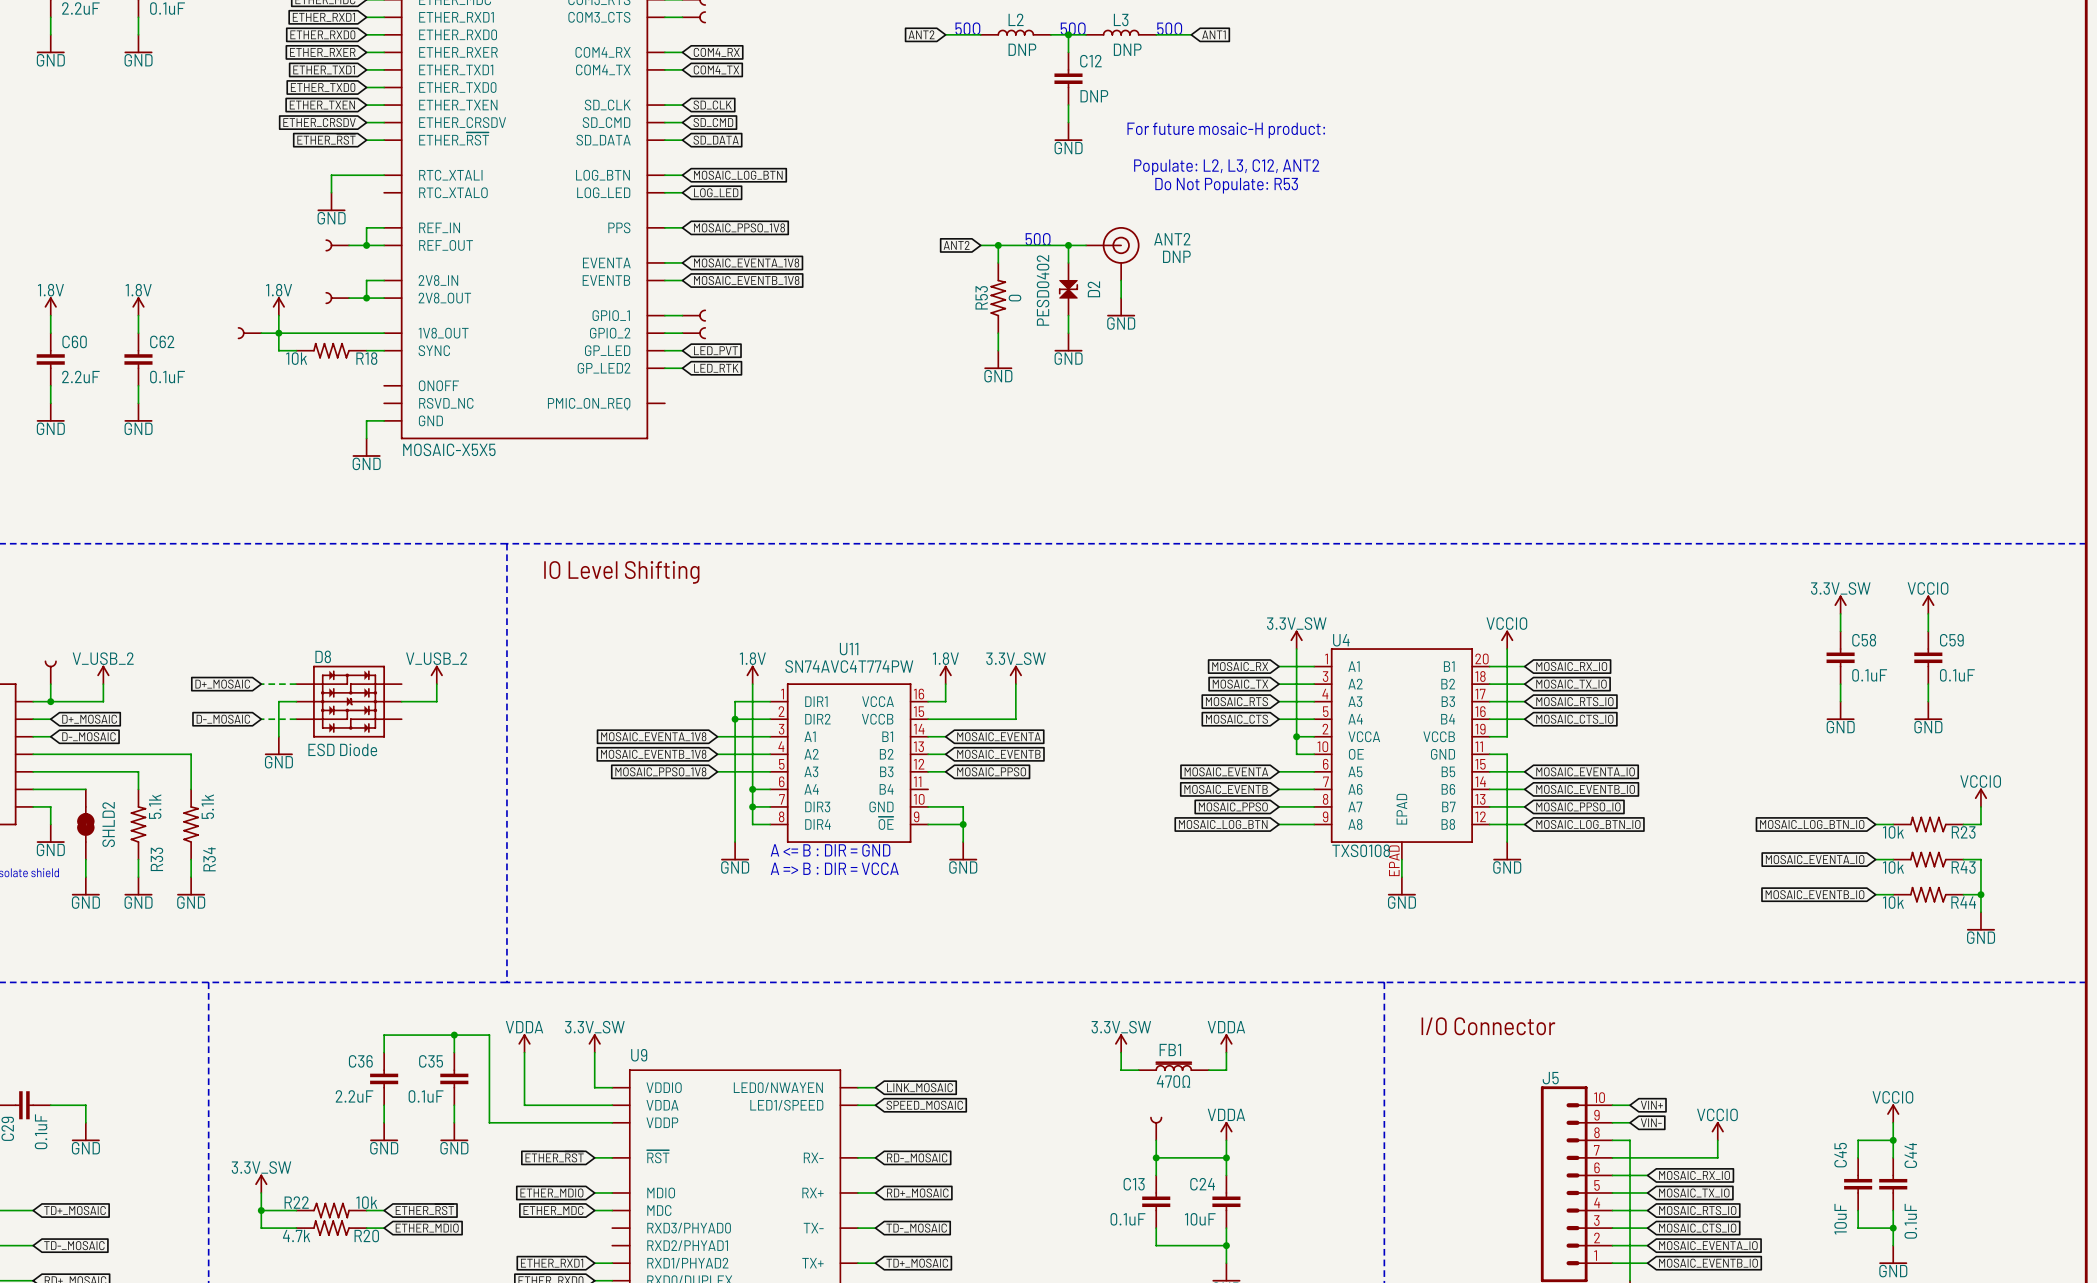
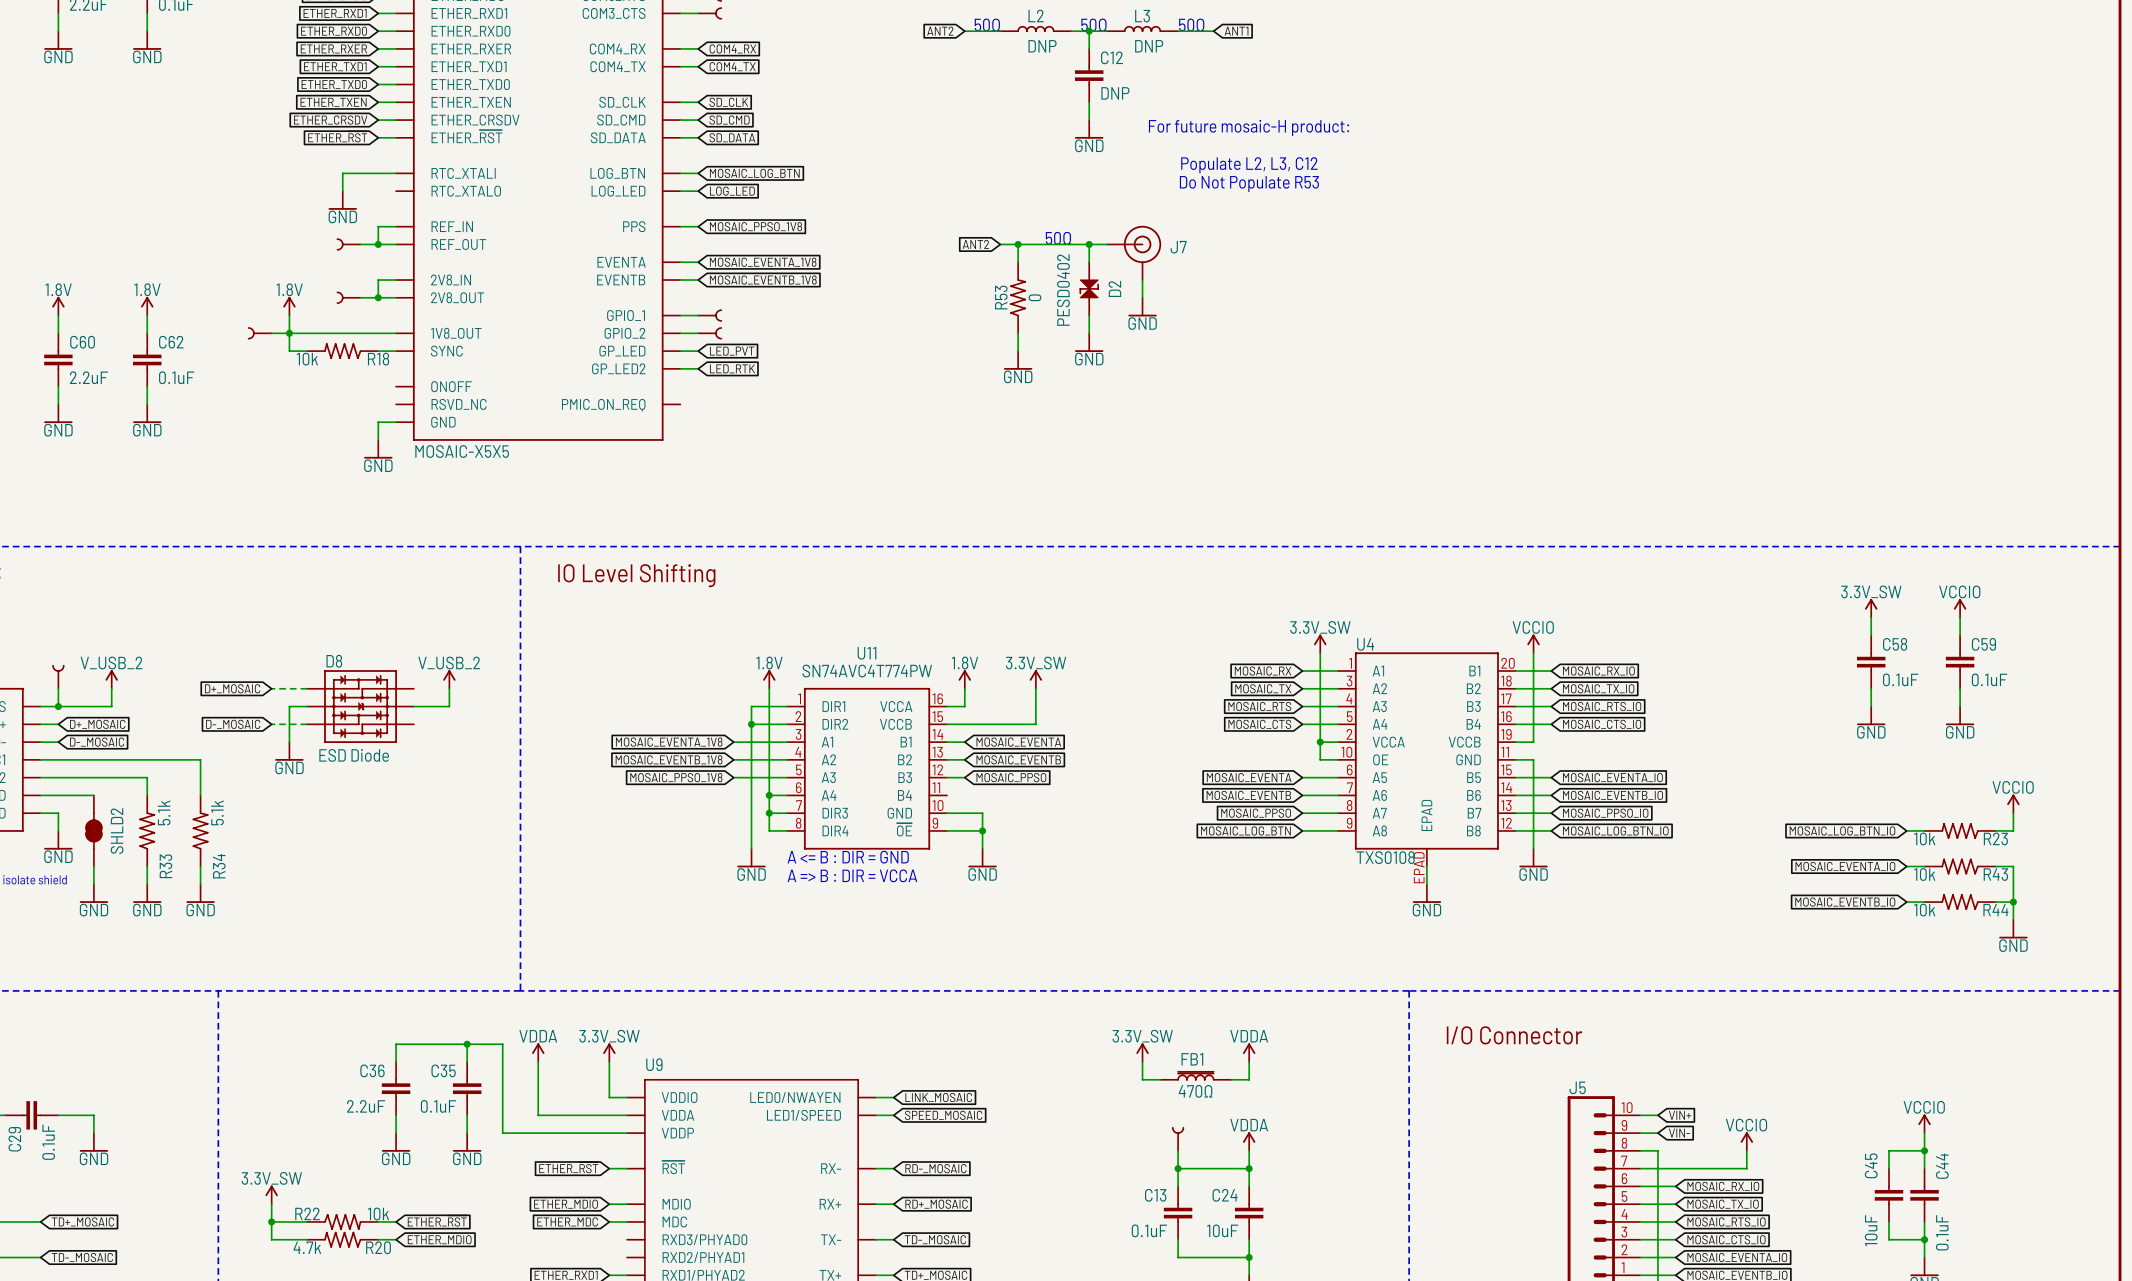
text: Populate: L2, L3, C12, ANT2 (1226, 167) -> Populate L2, L3, C12 (1249, 165)
text: Do Not Populate: R53 (1226, 185) -> Do Not Populate R53 (1249, 183)
ANT2 name: ANT2 (1172, 239) -> J7 (1178, 247)
ANT2 value: DNP (1176, 256) -> none

